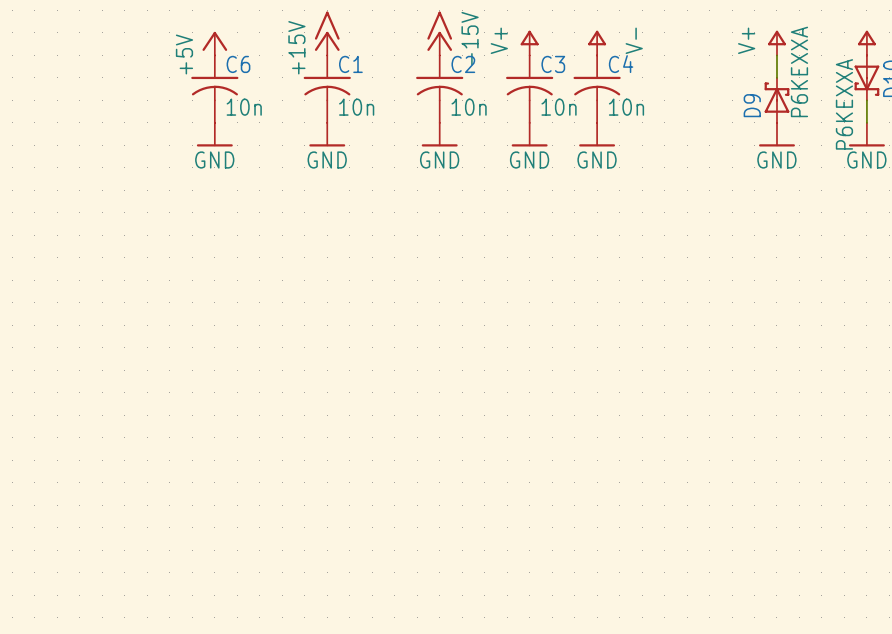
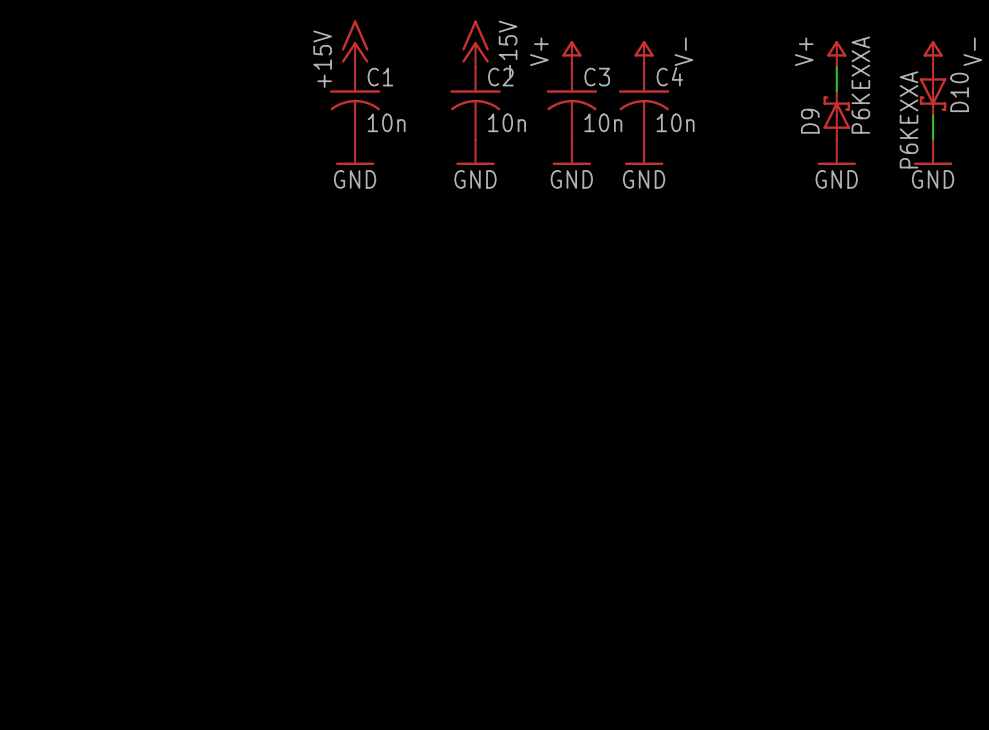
power symbol: +5V (214, 43) -> none
C6: 10n (214, 89) -> none
power symbol: GND (214, 134) -> none

